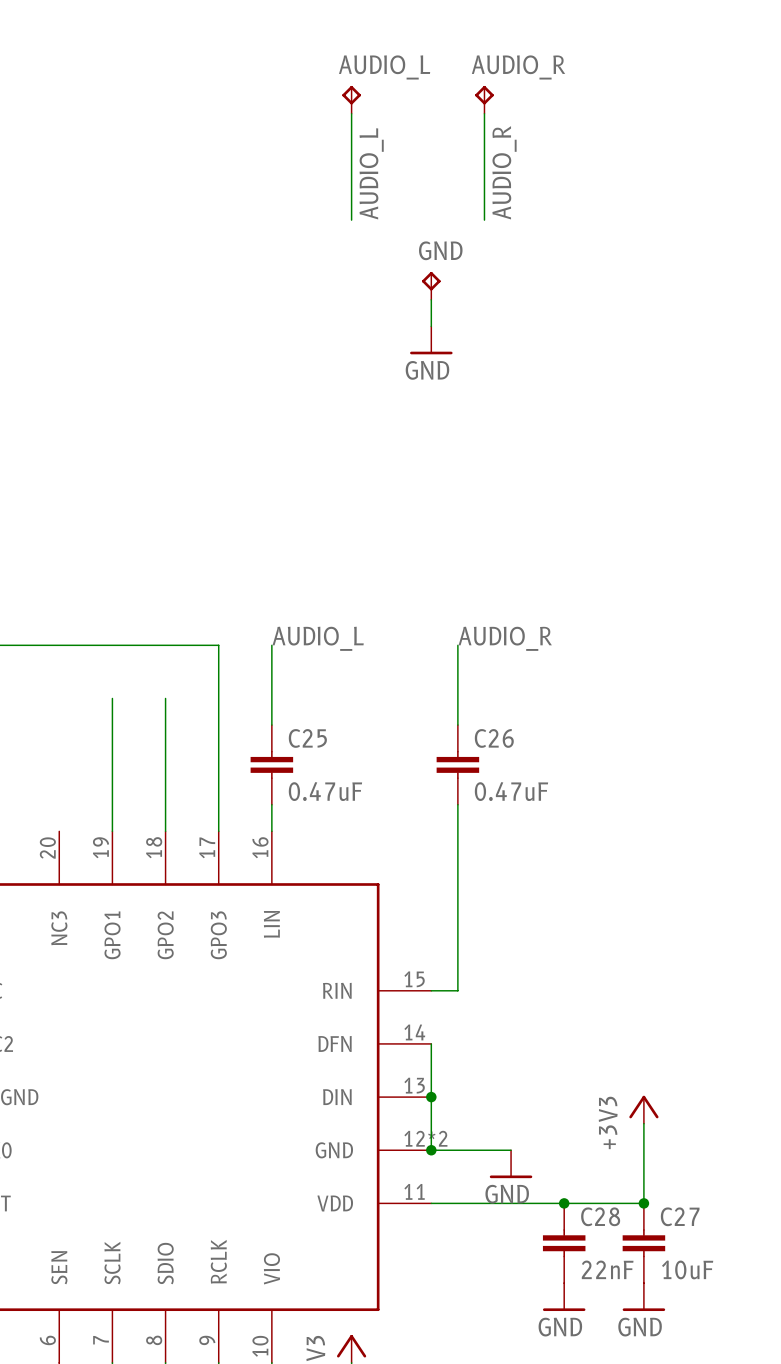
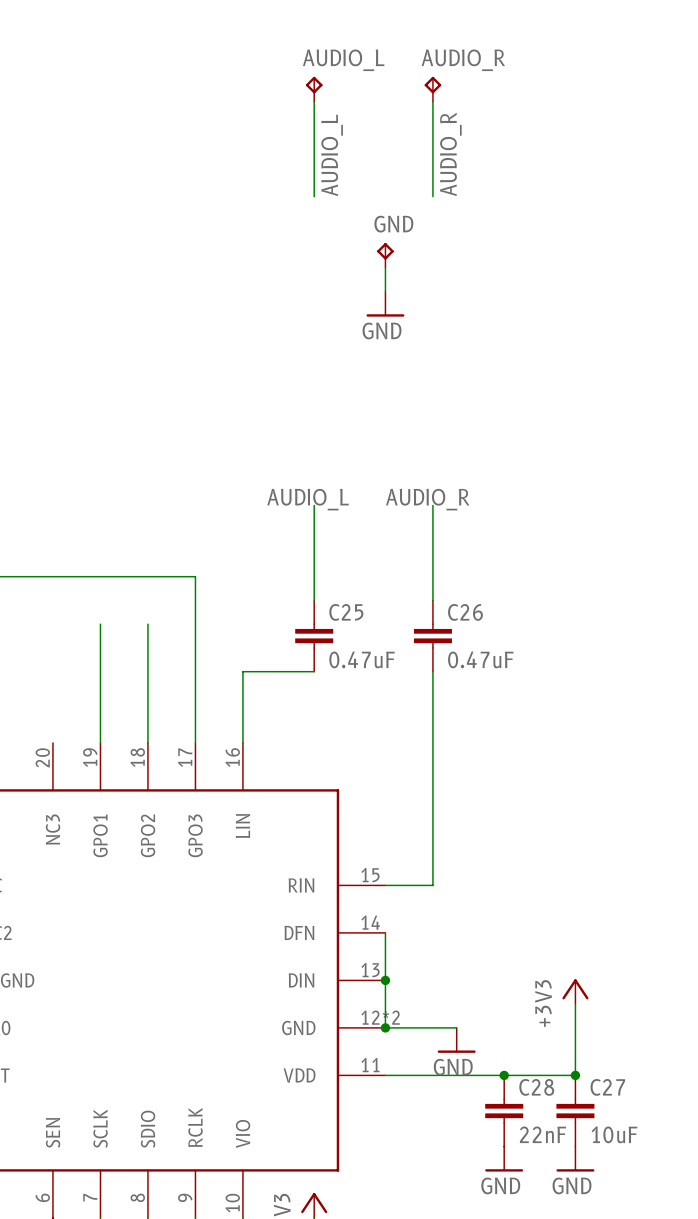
wire: none -> (314, 505) (314, 600)
wire: none -> (432, 505) (432, 600)
label position: AUDIO_L (318, 638) -> AUDIO_L (308, 499)
label position: AUDIO_R (505, 638) -> AUDIO_R (427, 499)
wire: (271, 645) (271, 725) -> none
wire: (457, 645) (457, 725) -> none
wire: none -> (314, 671) (242, 671) (242, 719)
C25 position: (271, 764) -> (314, 636)
C26 position: (457, 764) -> (432, 636)
wire: (457, 804) (457, 990) -> (432, 671) (432, 885) (409, 885)

